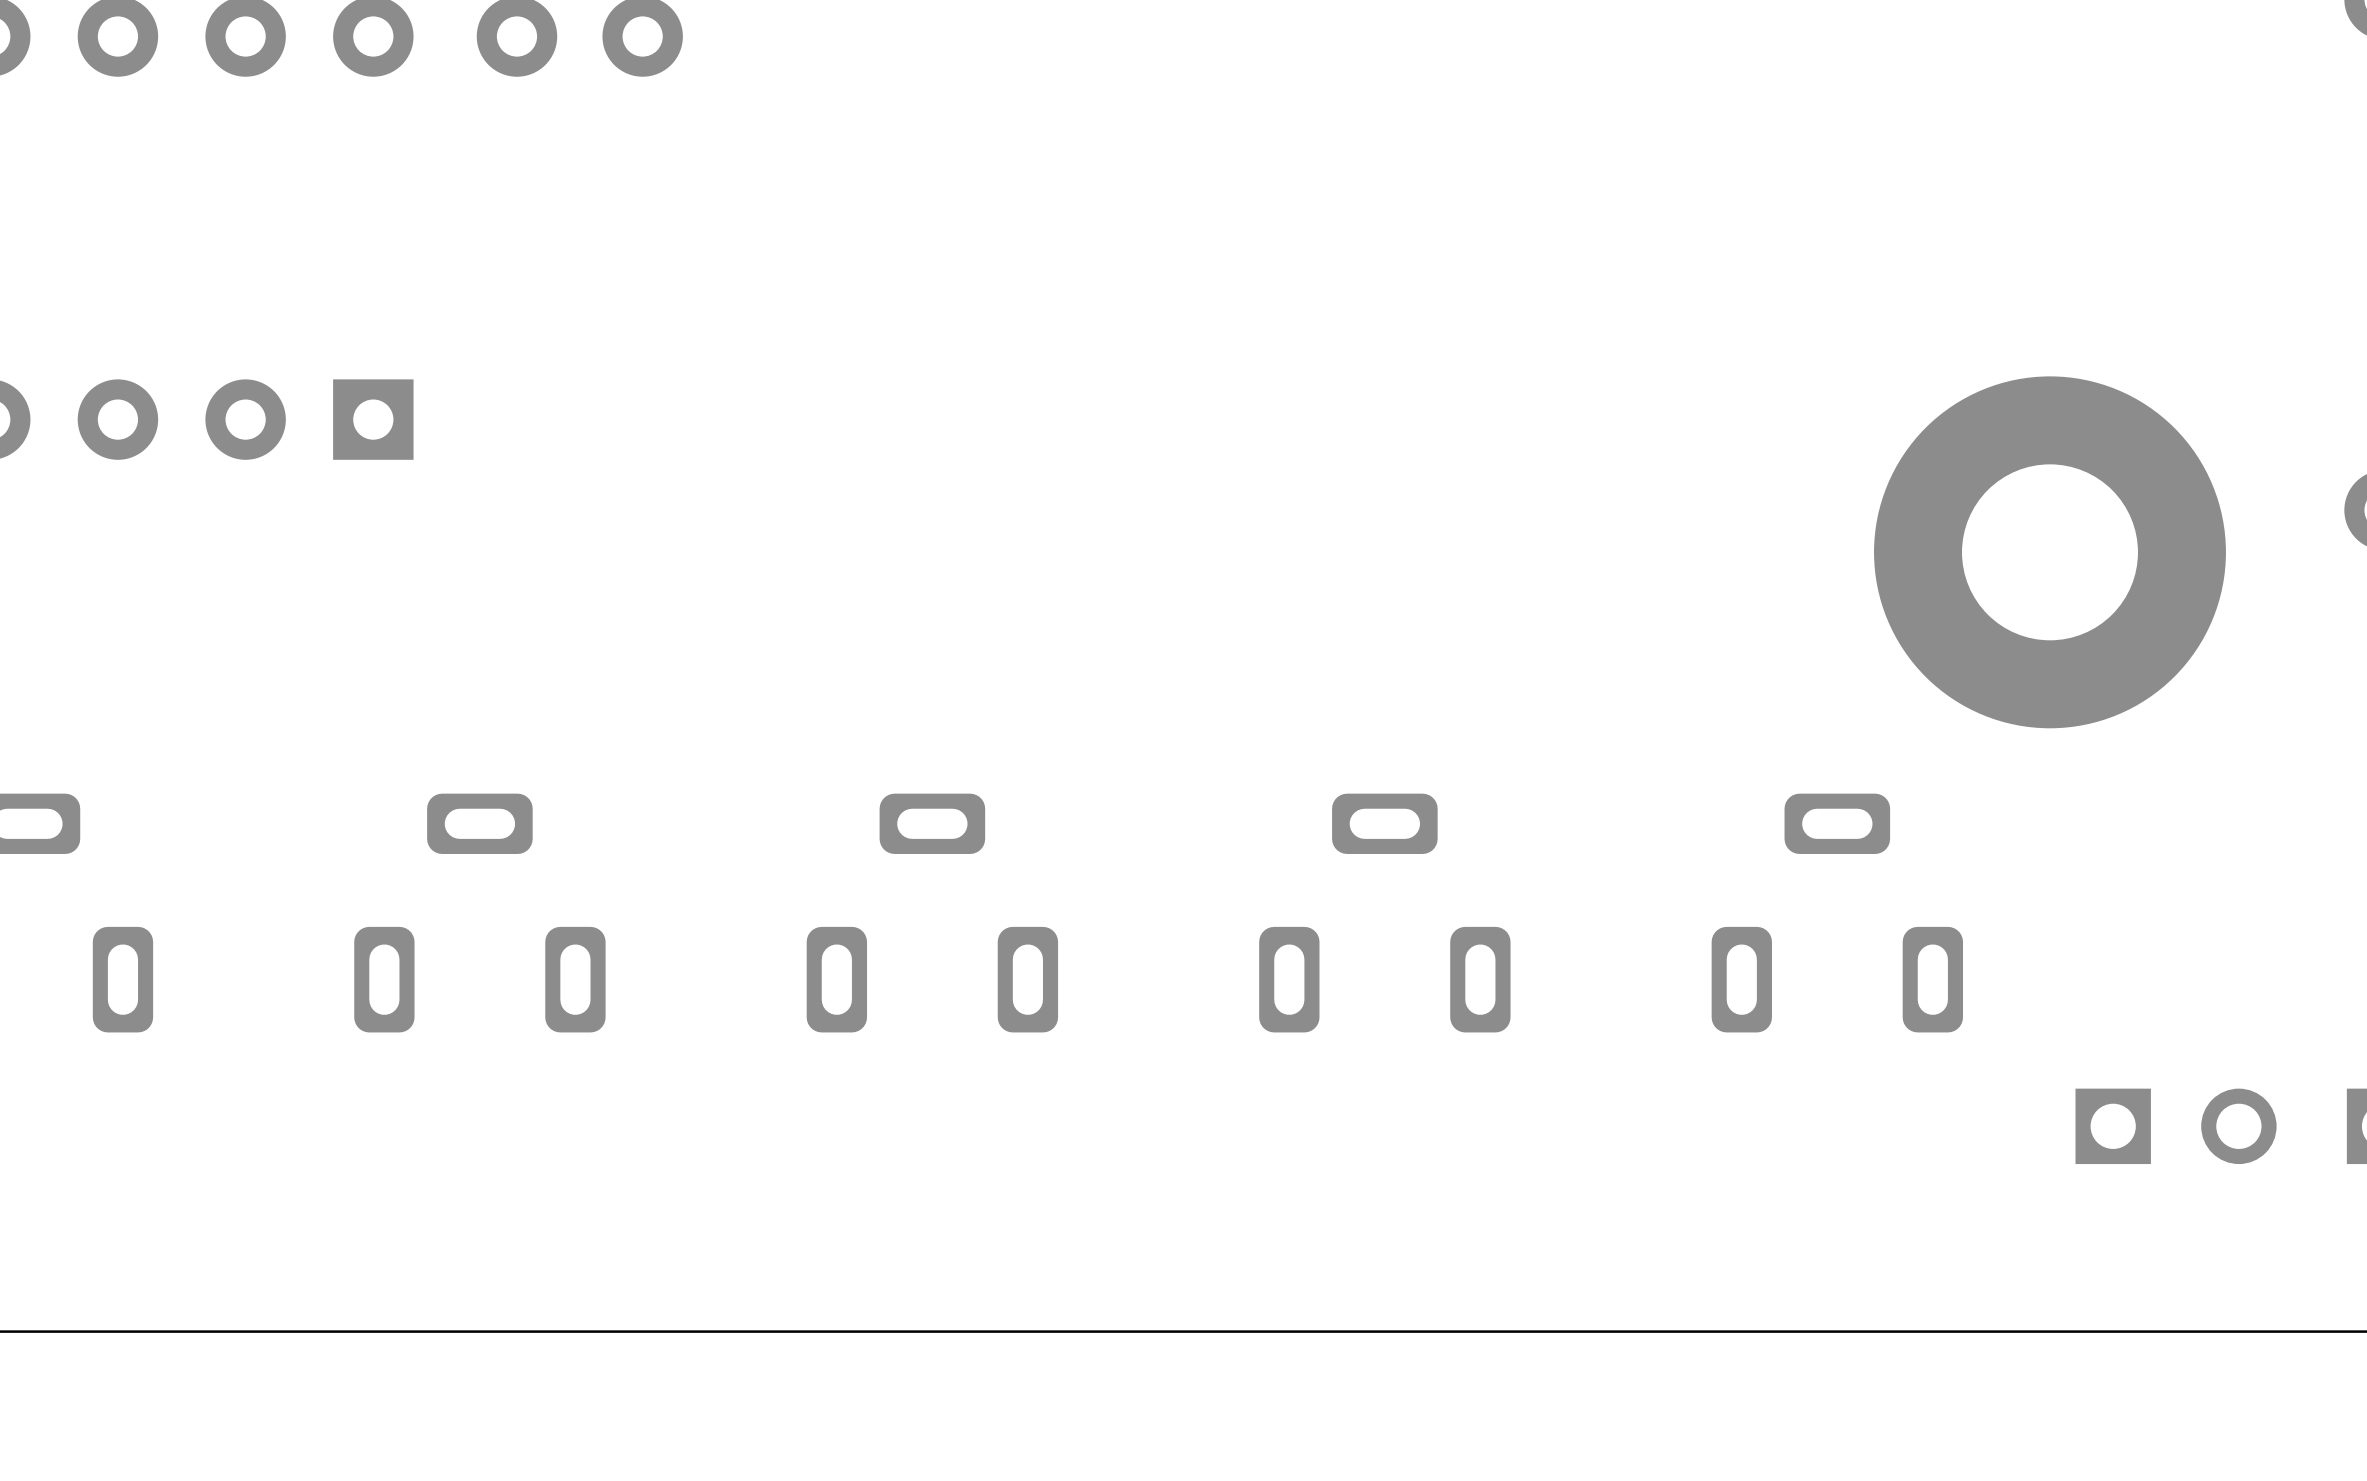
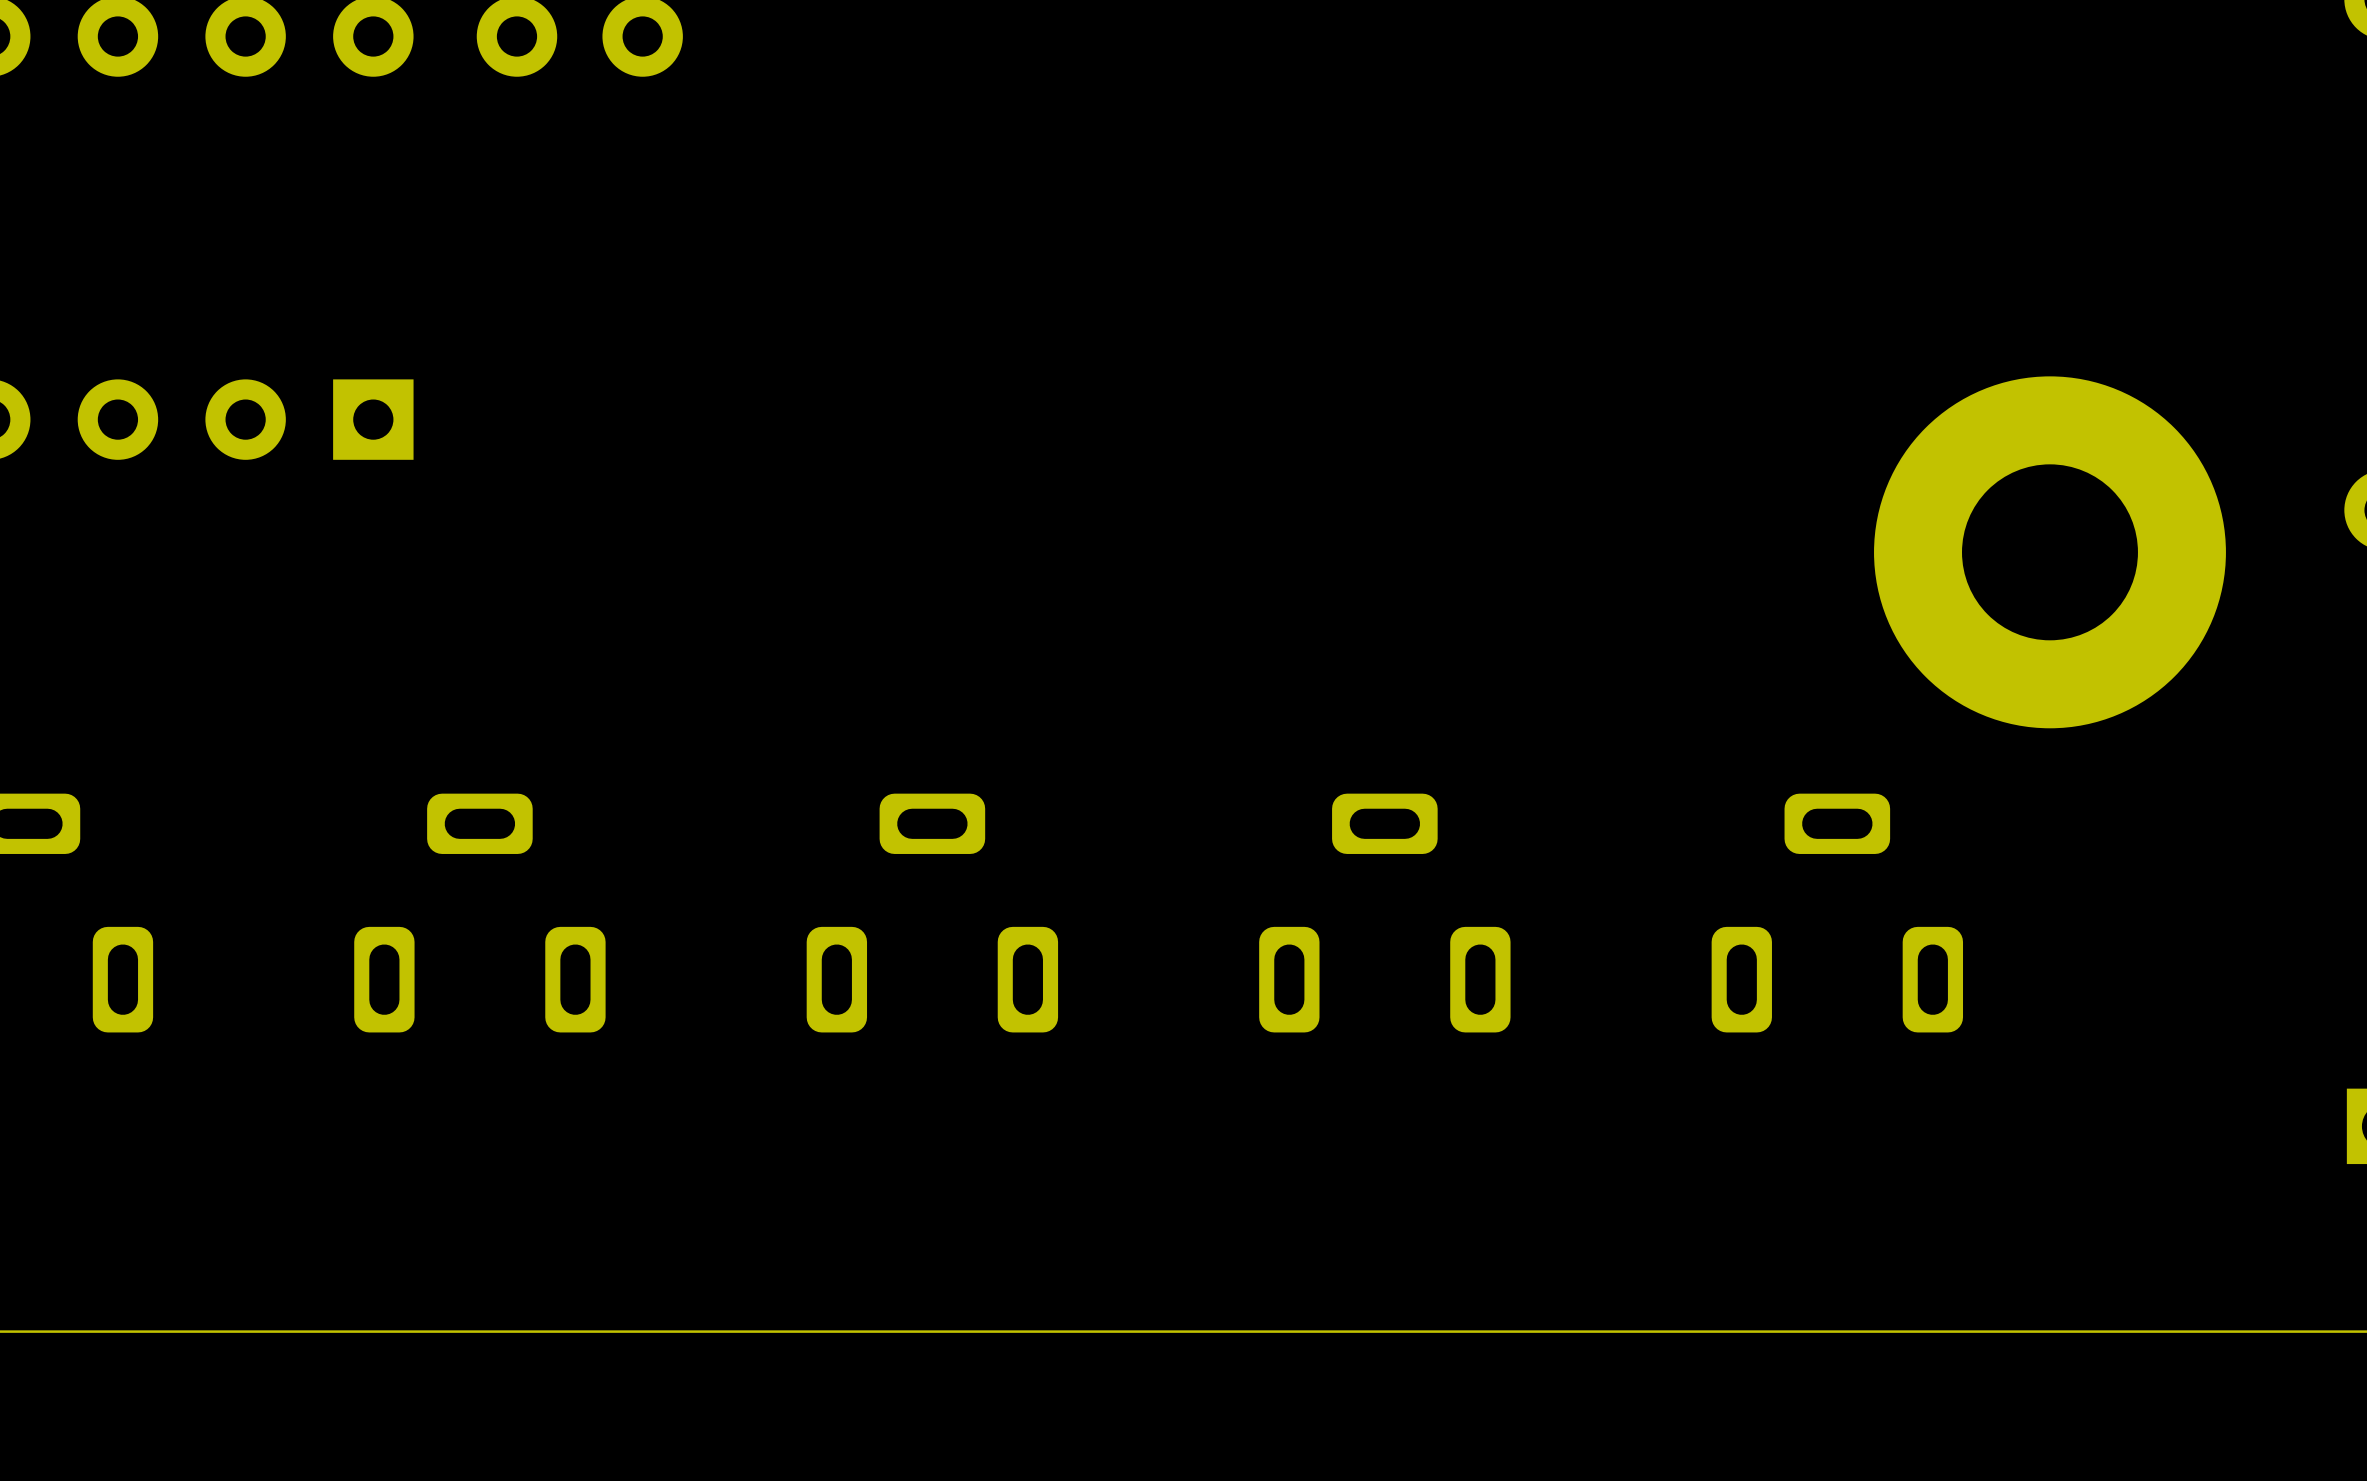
part: (2176, 1126) -> none

